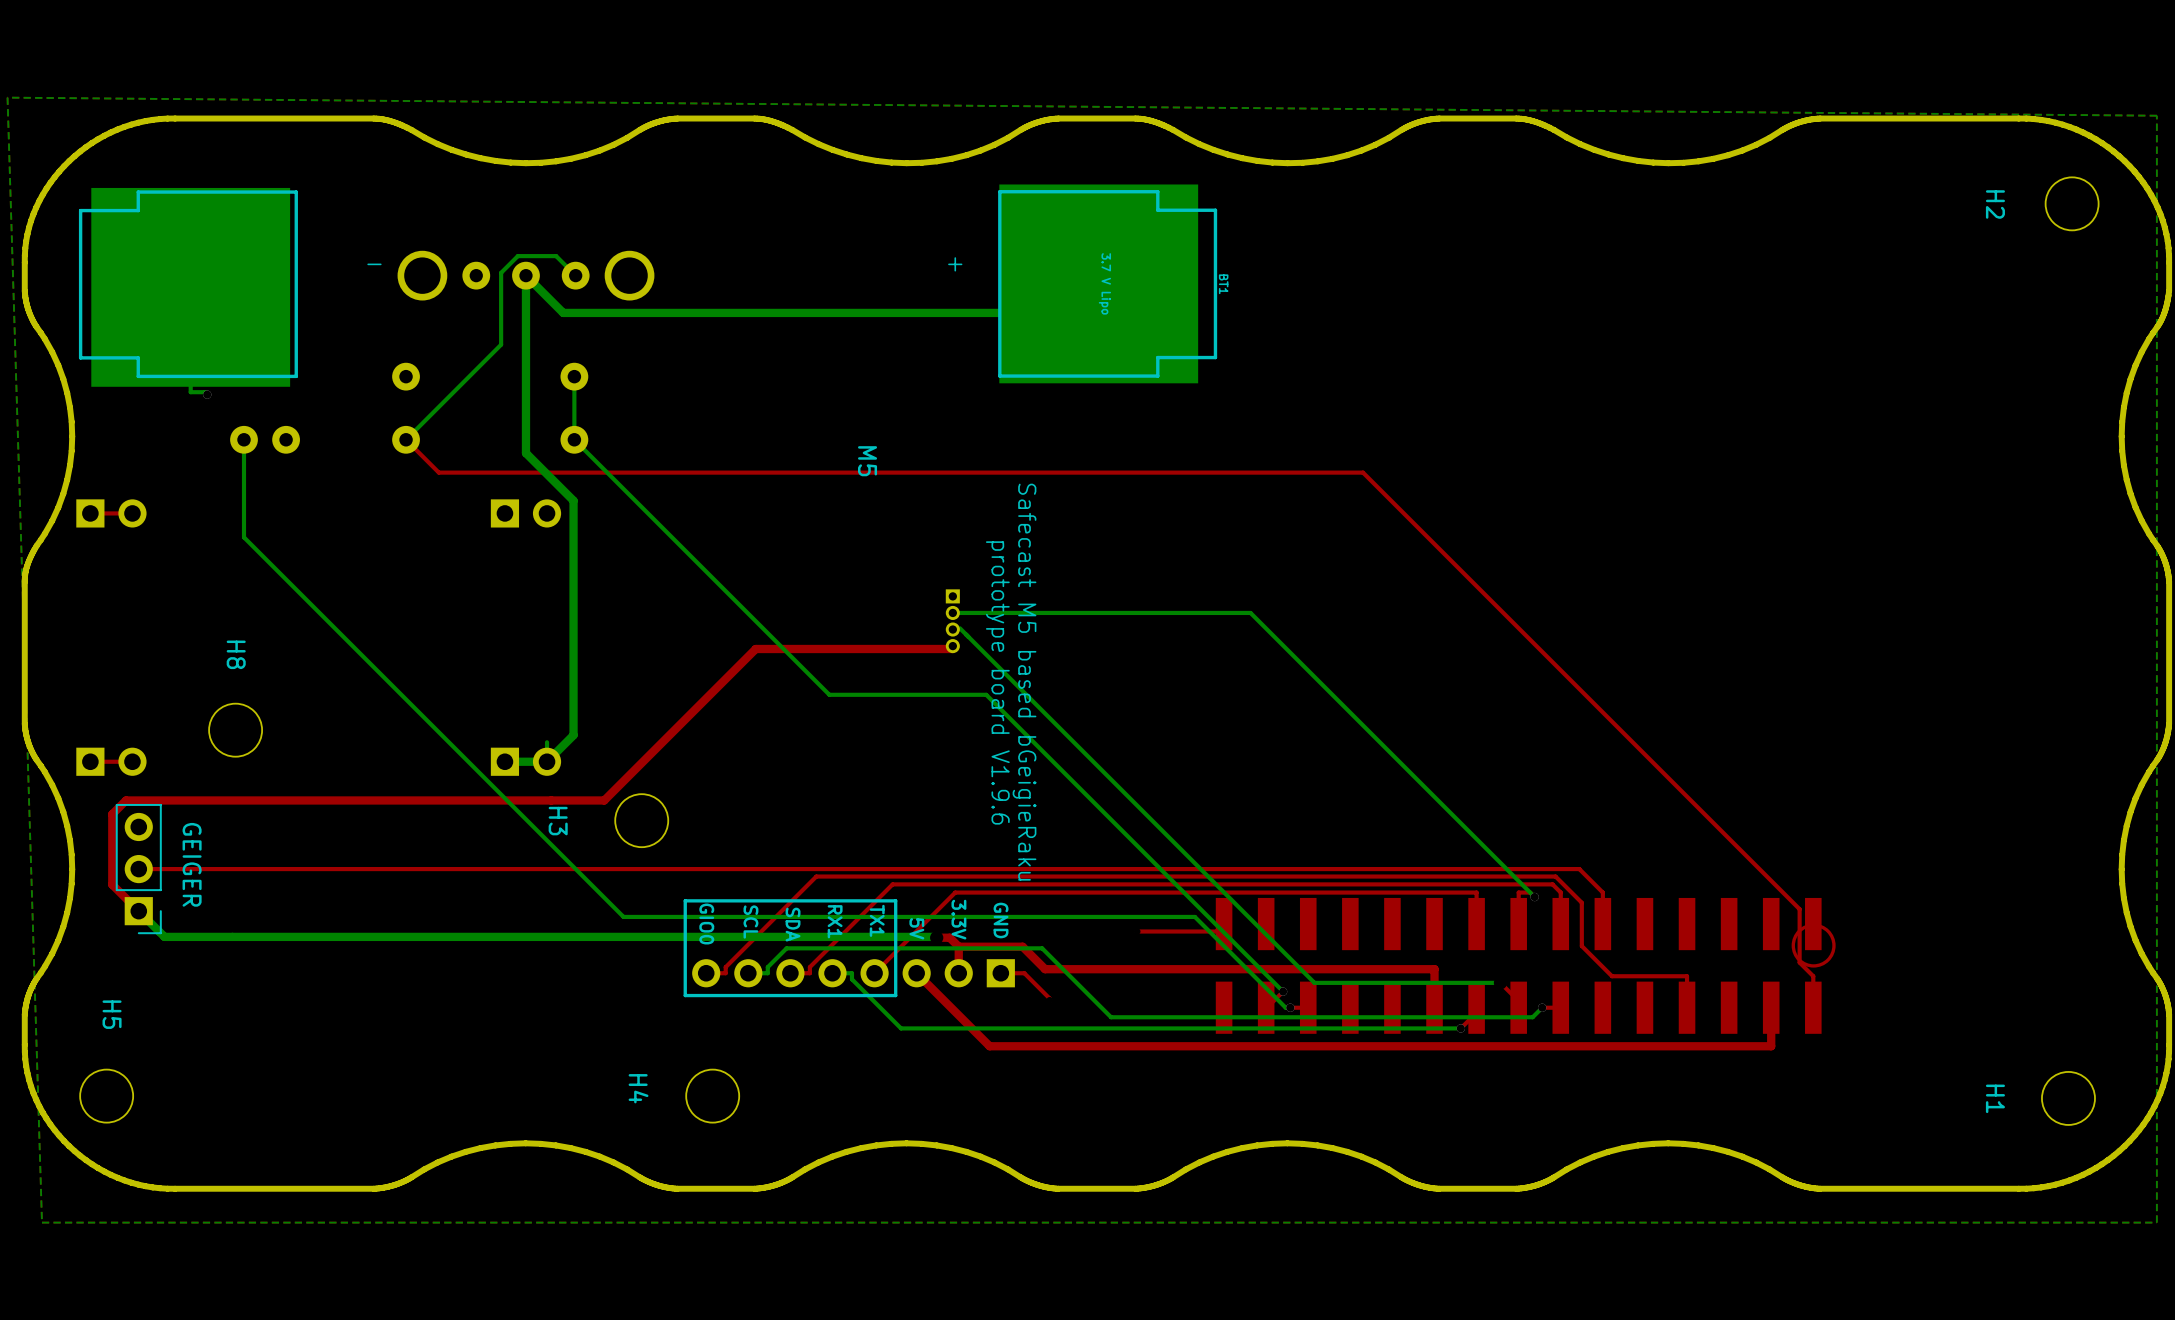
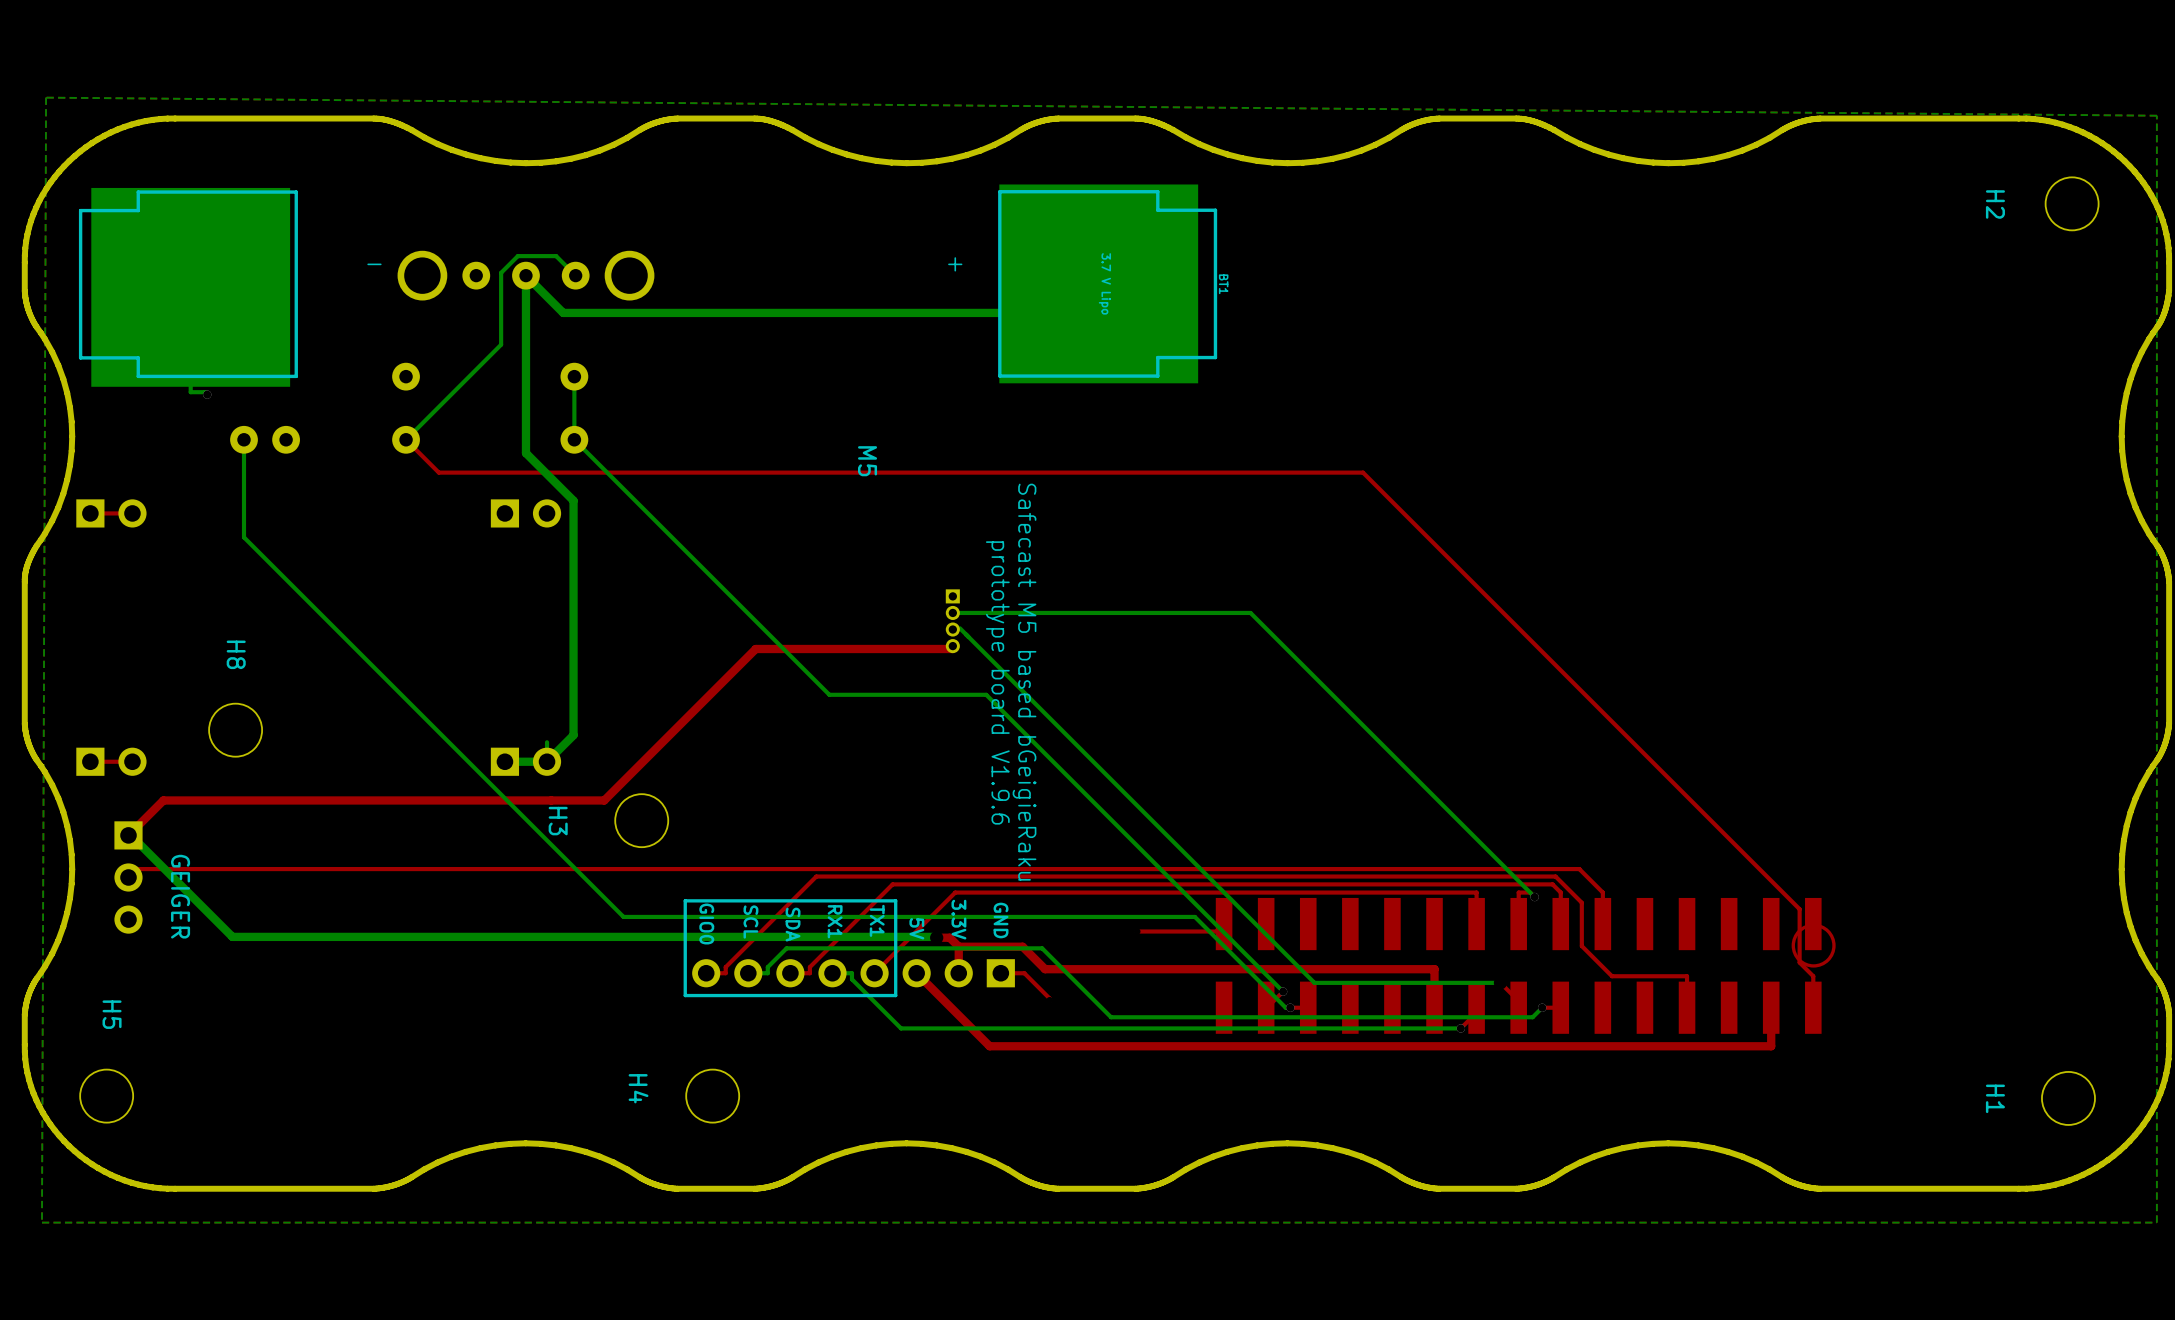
bottom zone outline: (2156, 115) (7, 97) (41, 1222) -> (2156, 115) (46, 97) (41, 1222)
top track: (163, 800) (126, 800) (112, 814) (112, 884) (138, 911) -> (163, 800) (128, 835)
part side: bottom (138, 869) -> top (128, 877)
bottom track: (138, 911) (164, 936) (232, 936) -> (130, 835) (232, 936)

